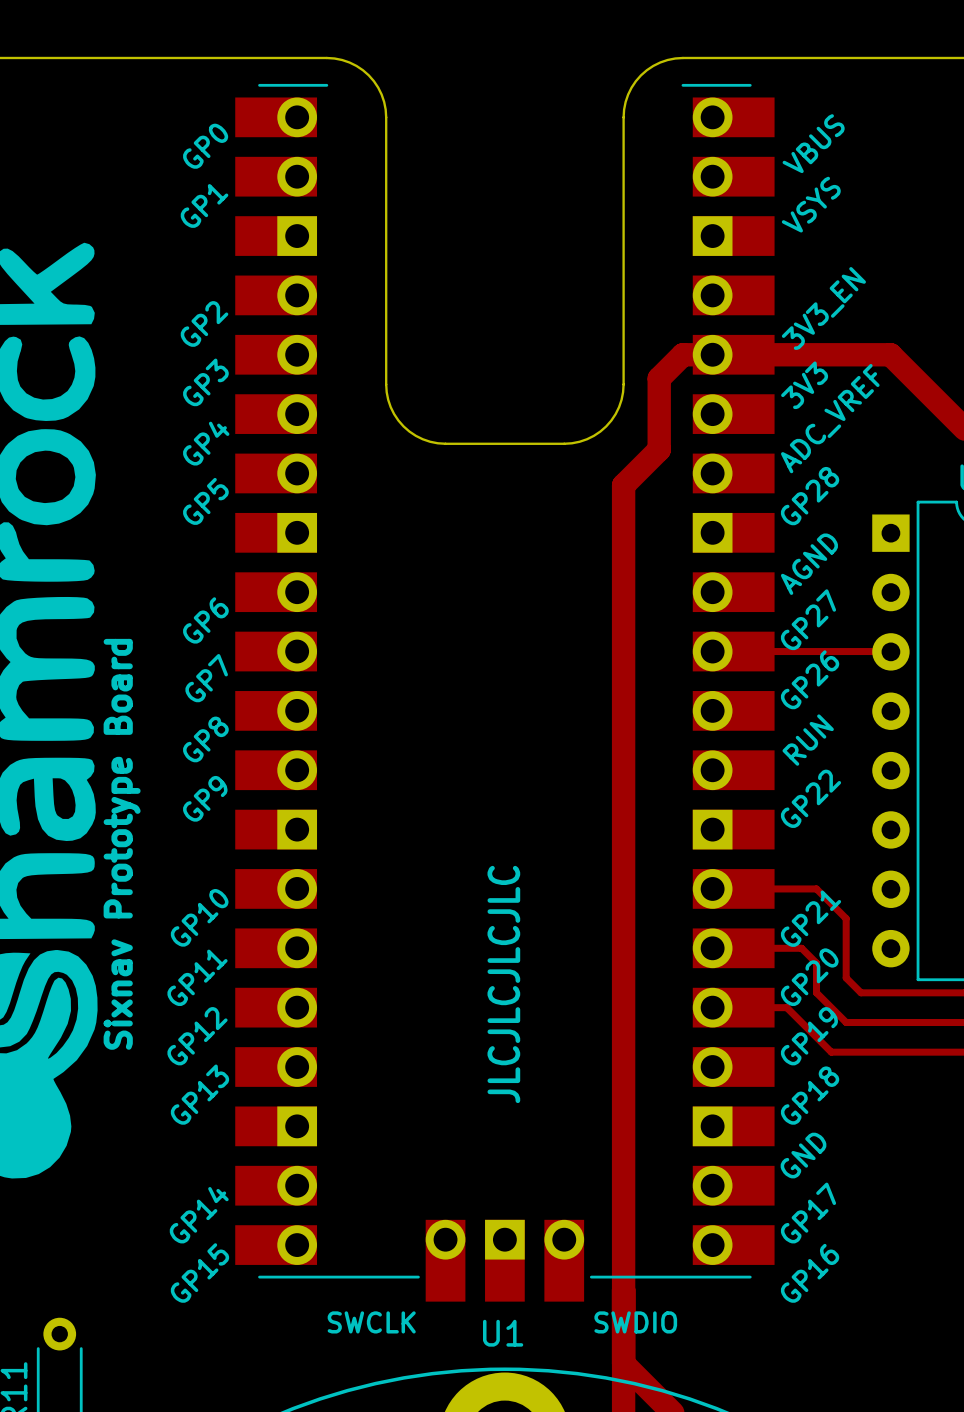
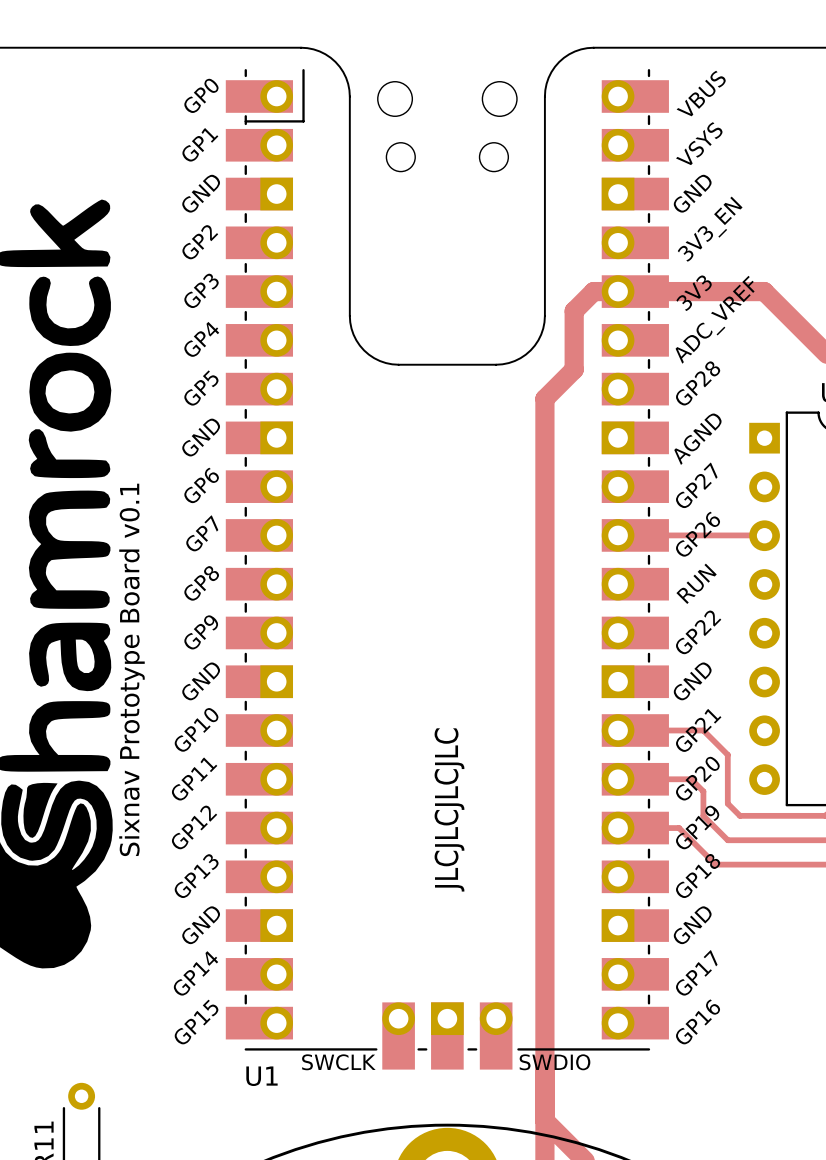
U1 footprint: [235, 83, 775, 1302] -> [225, 69, 669, 1070]
text: Sixnav Prototype Board (122, 844) -> Sixnav Prototype Board v0.1 (131, 669)
U1 name position: U1 (503, 1333) -> U1 (261, 1076)

